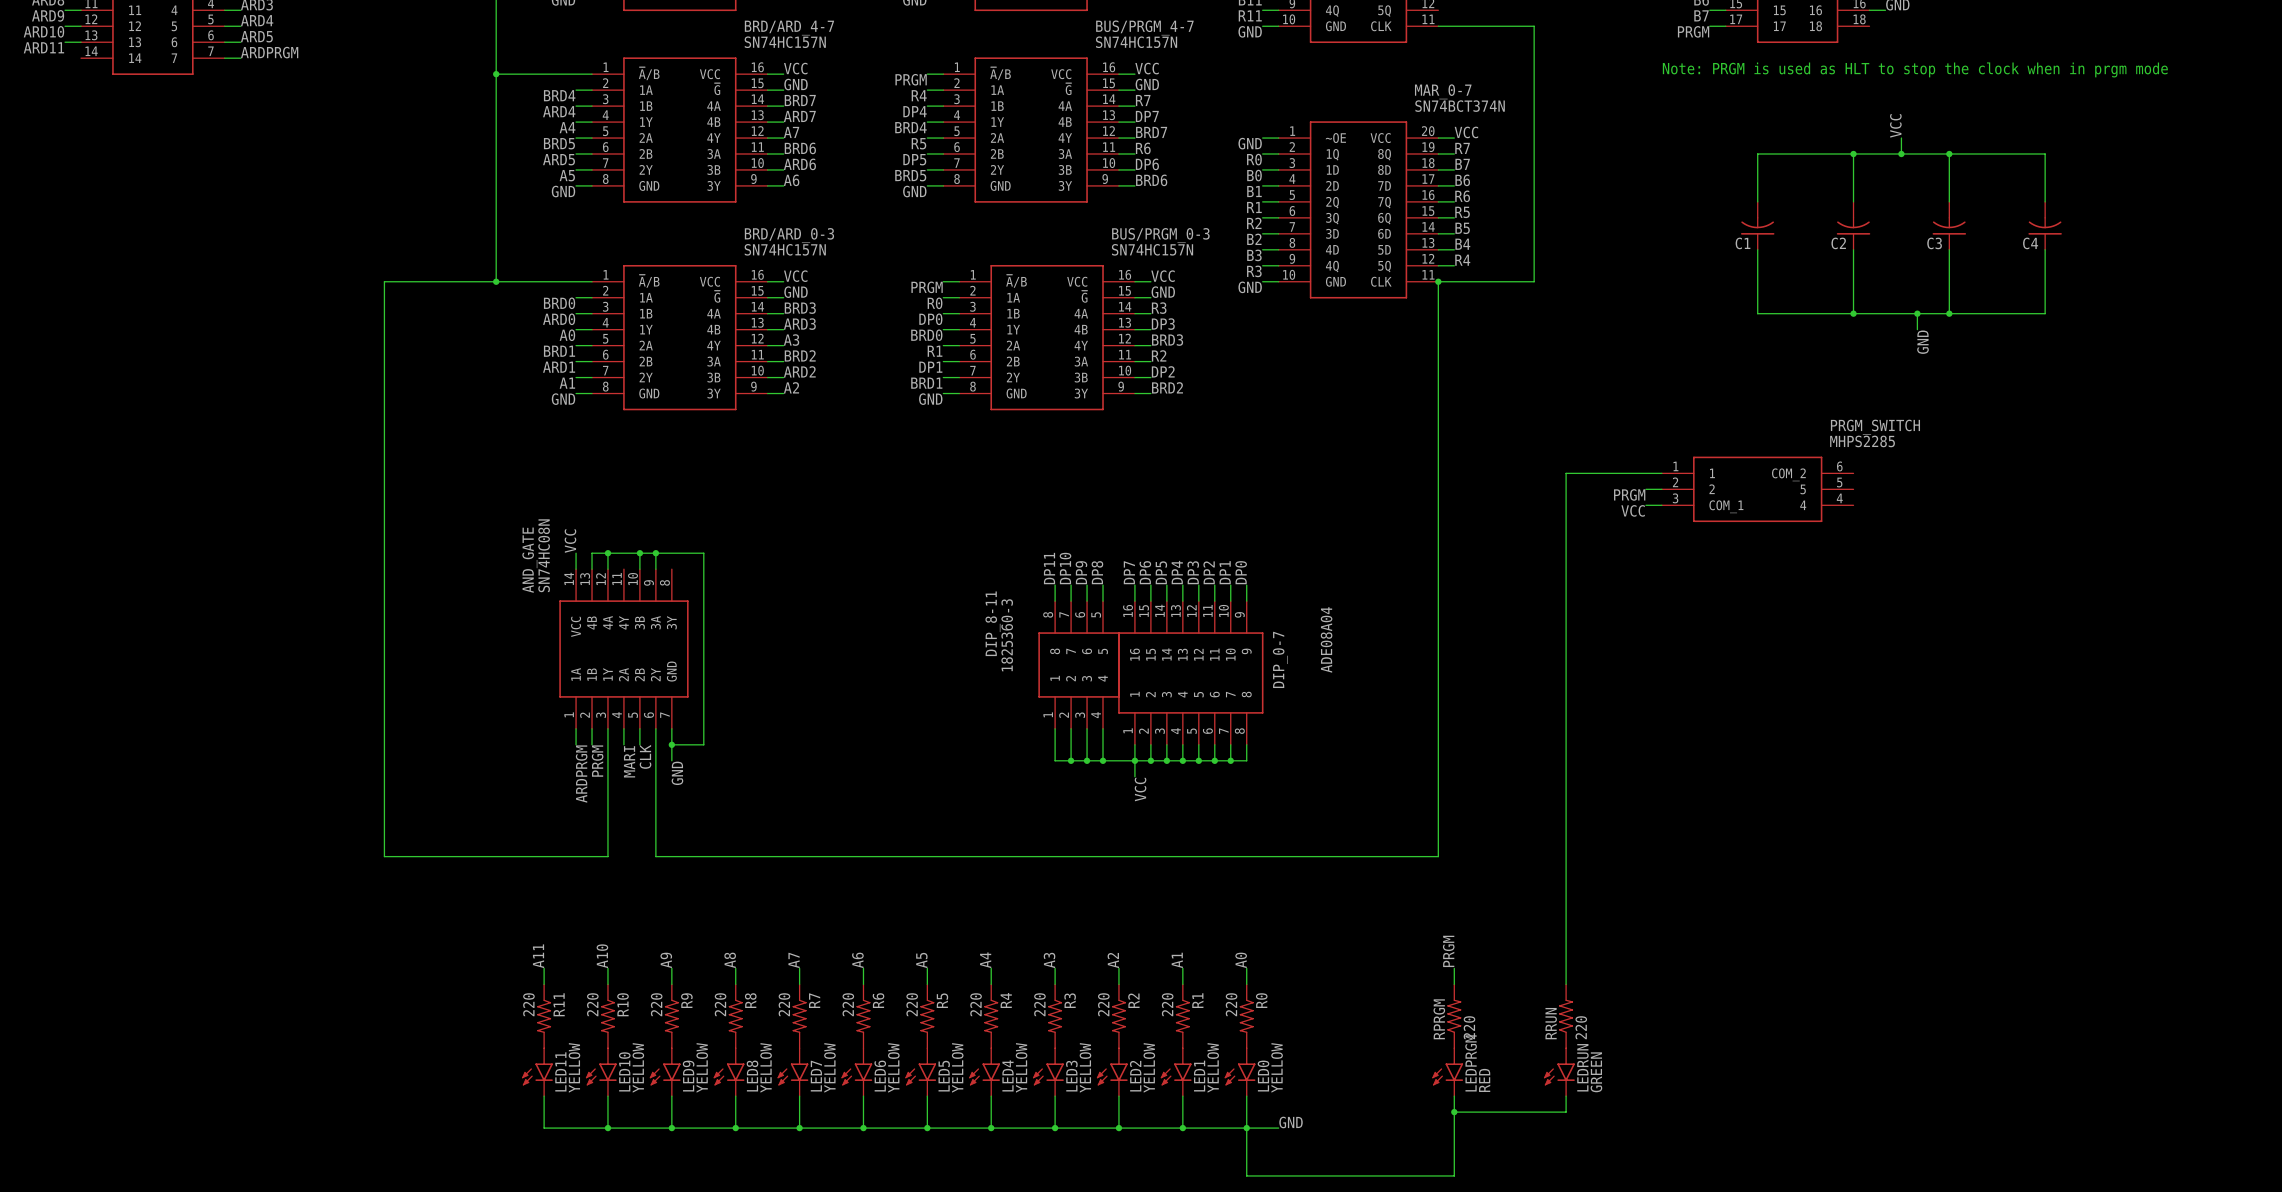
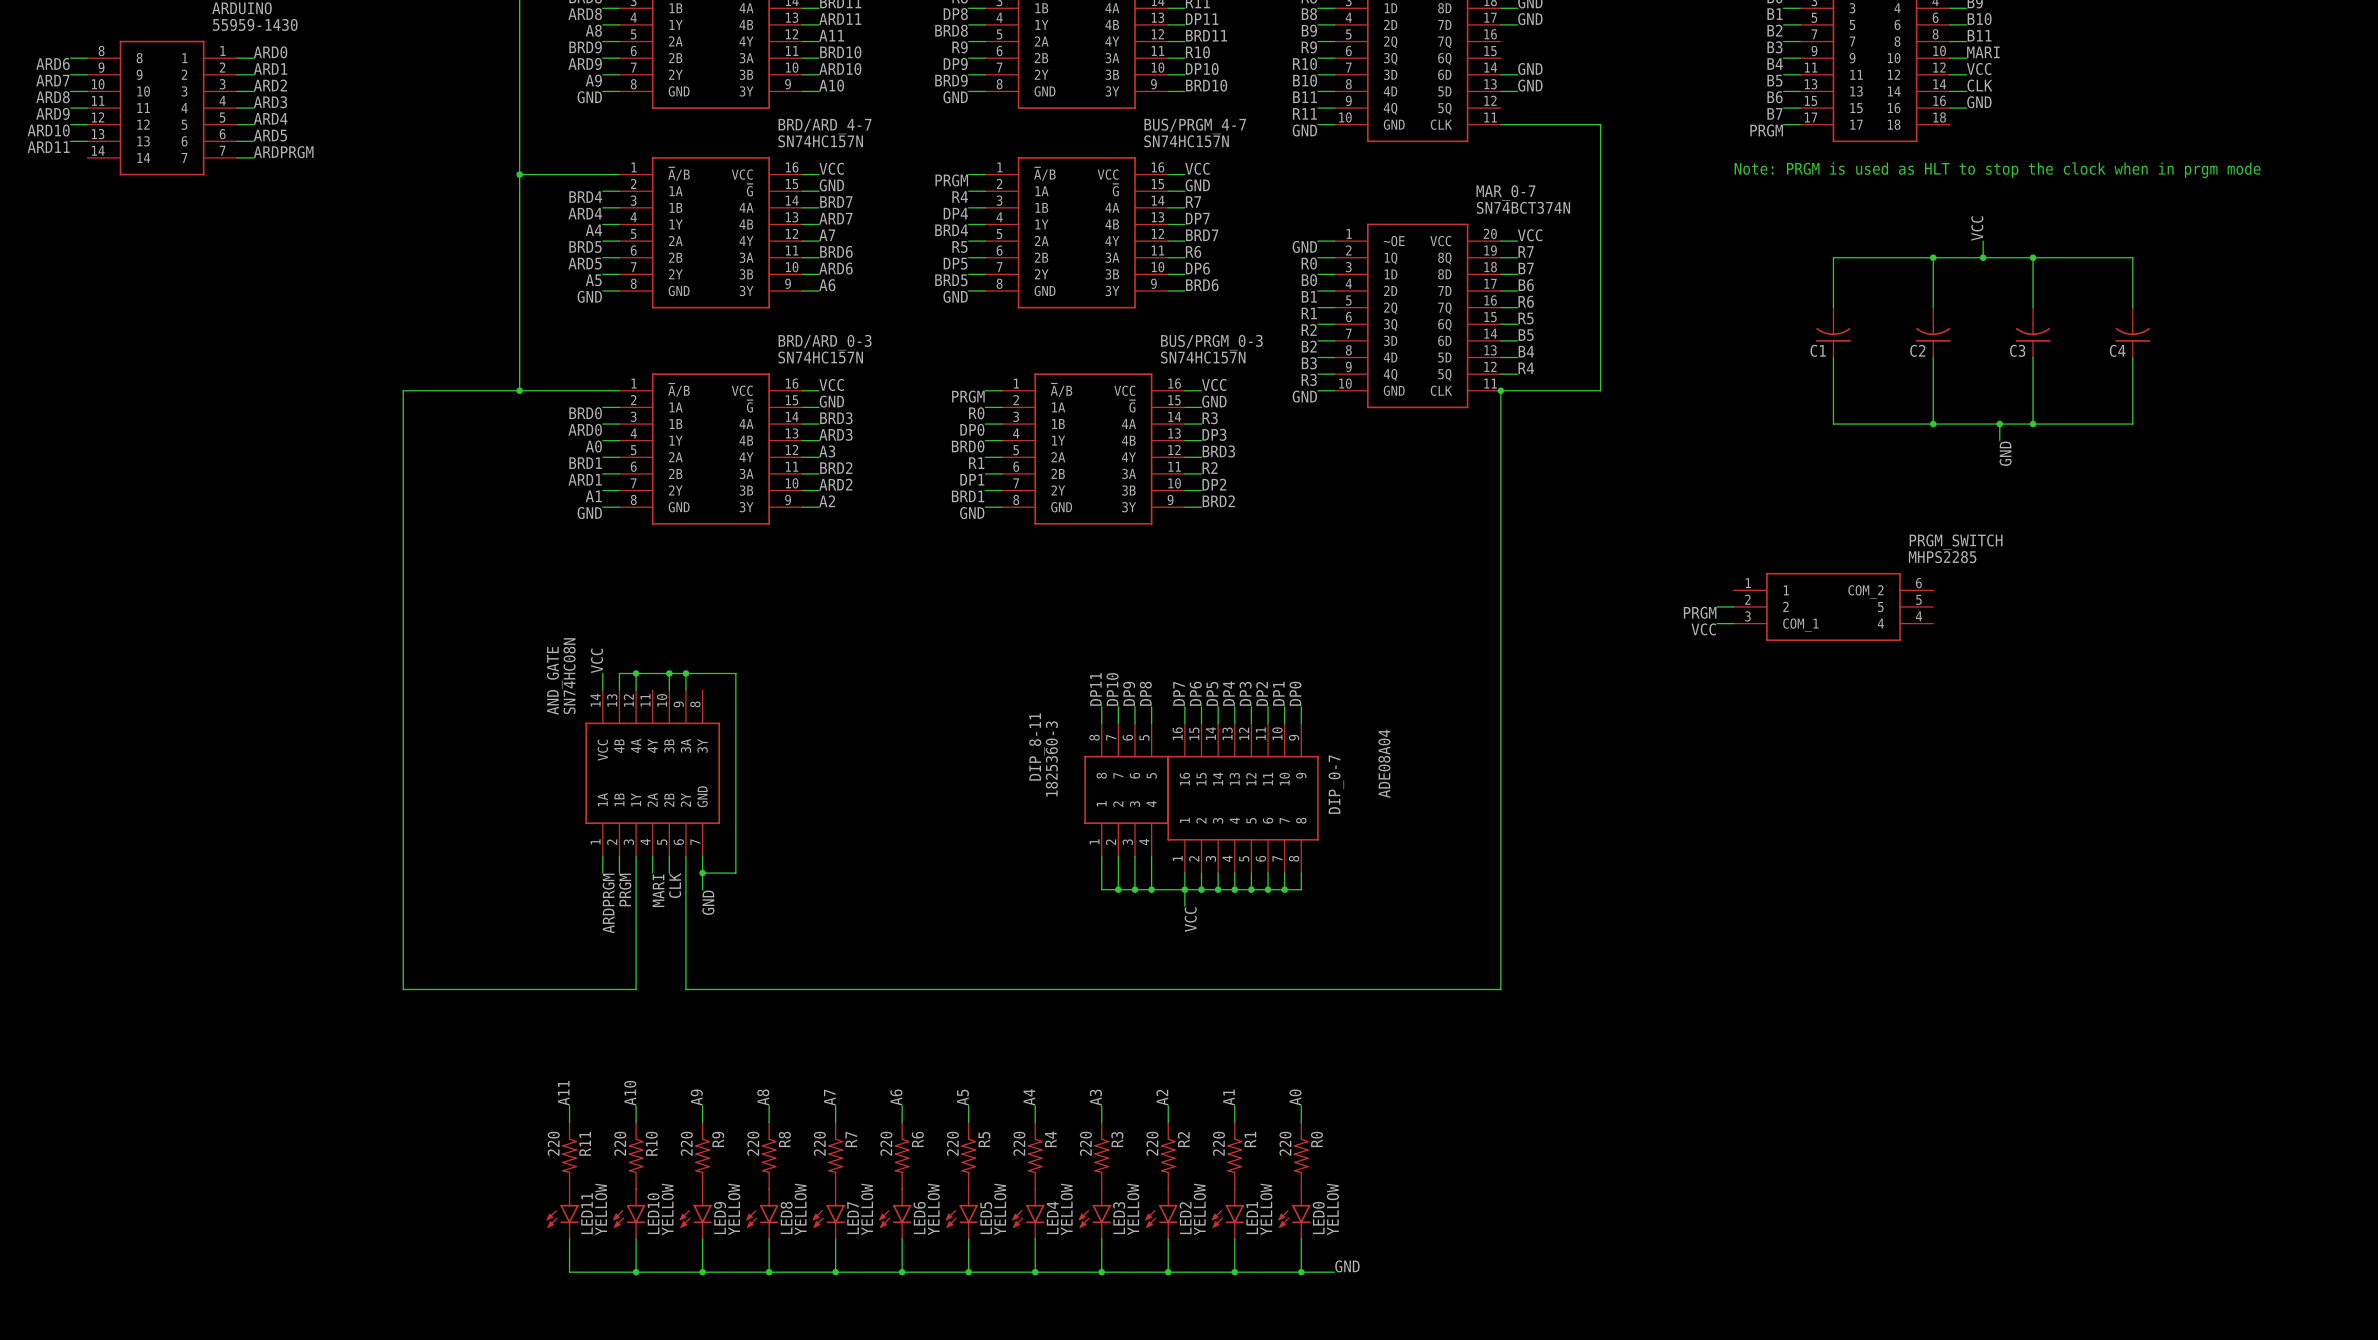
wire: (1661, 473) (1566, 473) (1566, 984) -> none
label: PRGM (1448, 951) -> none
wire: (1454, 968) (1454, 984) -> none
RPRGM: 220 (1454, 1016) -> none
RRUN: 220 (1566, 1016) -> none
LEDPRGM: RED (1447, 1072) -> none
LEDRUN: GREEN (1559, 1072) -> none
wire: (1454, 1096) (1454, 1175) (1246, 1175) (1246, 1128) -> none
wire: (1566, 1096) (1566, 1112) (1454, 1112) -> none
junction: (1454, 1112) -> none

